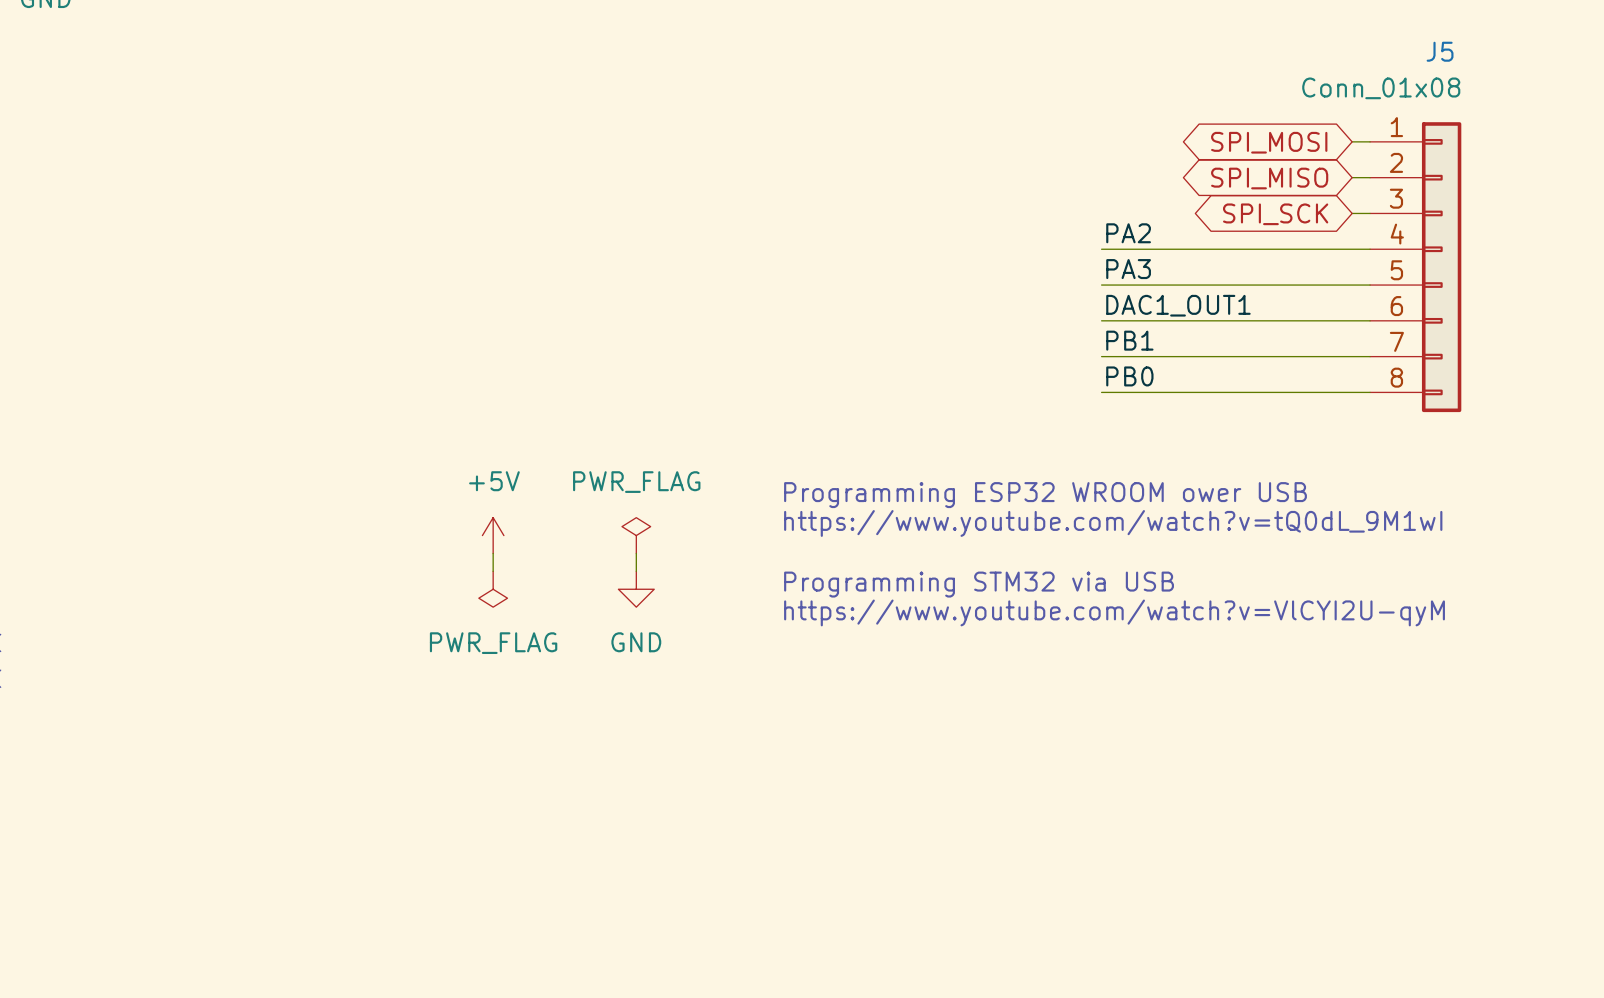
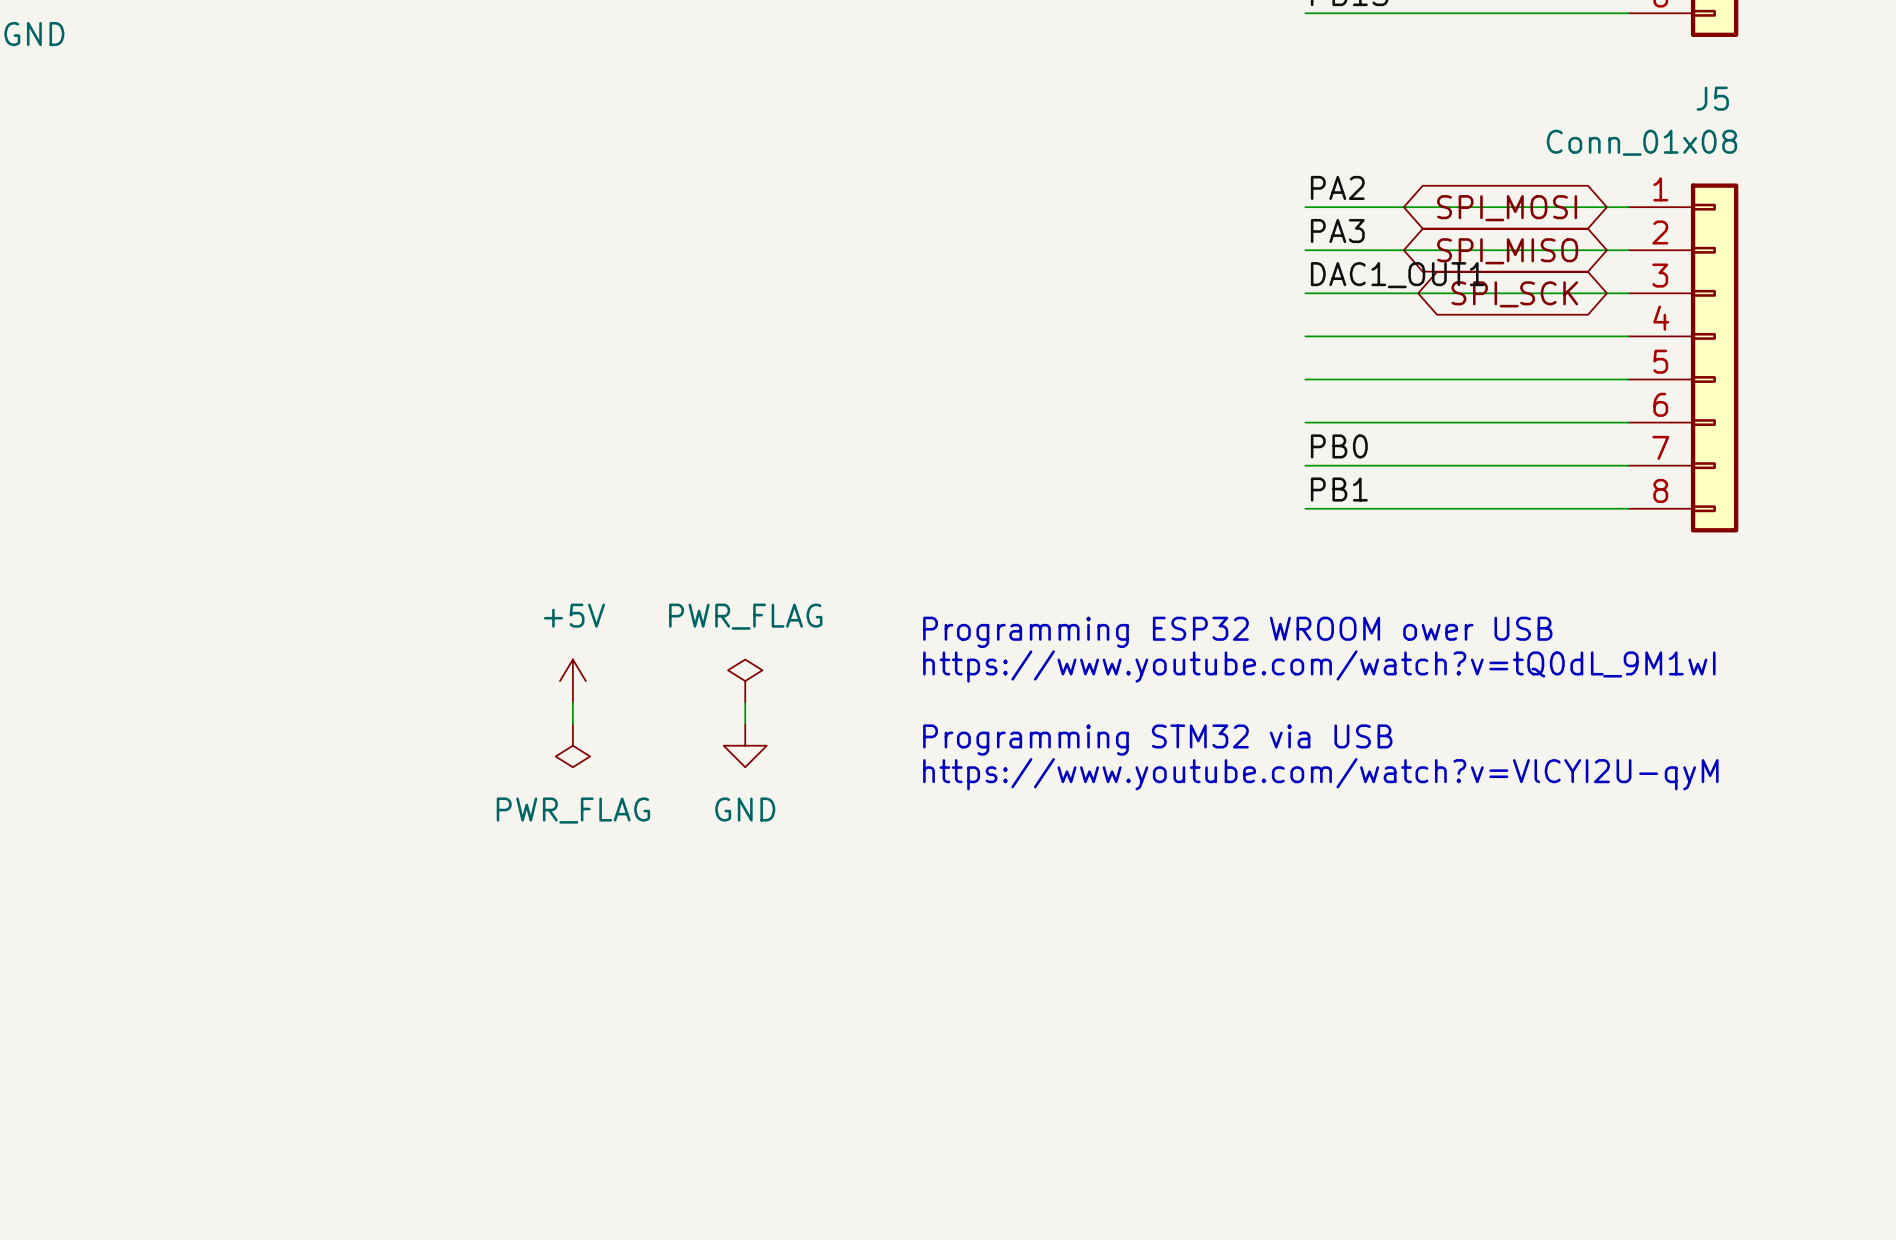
wire: none -> (1305, 207) (1606, 207)
wire: none -> (1305, 250) (1606, 250)
wire: none -> (1305, 293) (1606, 293)
label position: PA2 (1128, 233) -> PA2 (1337, 187)
label position: PA3 (1128, 269) -> PA3 (1337, 231)
label position: DAC1_OUT1 (1178, 305) -> DAC1_OUT1 (1397, 275)
label: PB1 (1129, 340) -> PB0 (1339, 446)
label: PB0 (1129, 376) -> PB1 (1339, 489)

